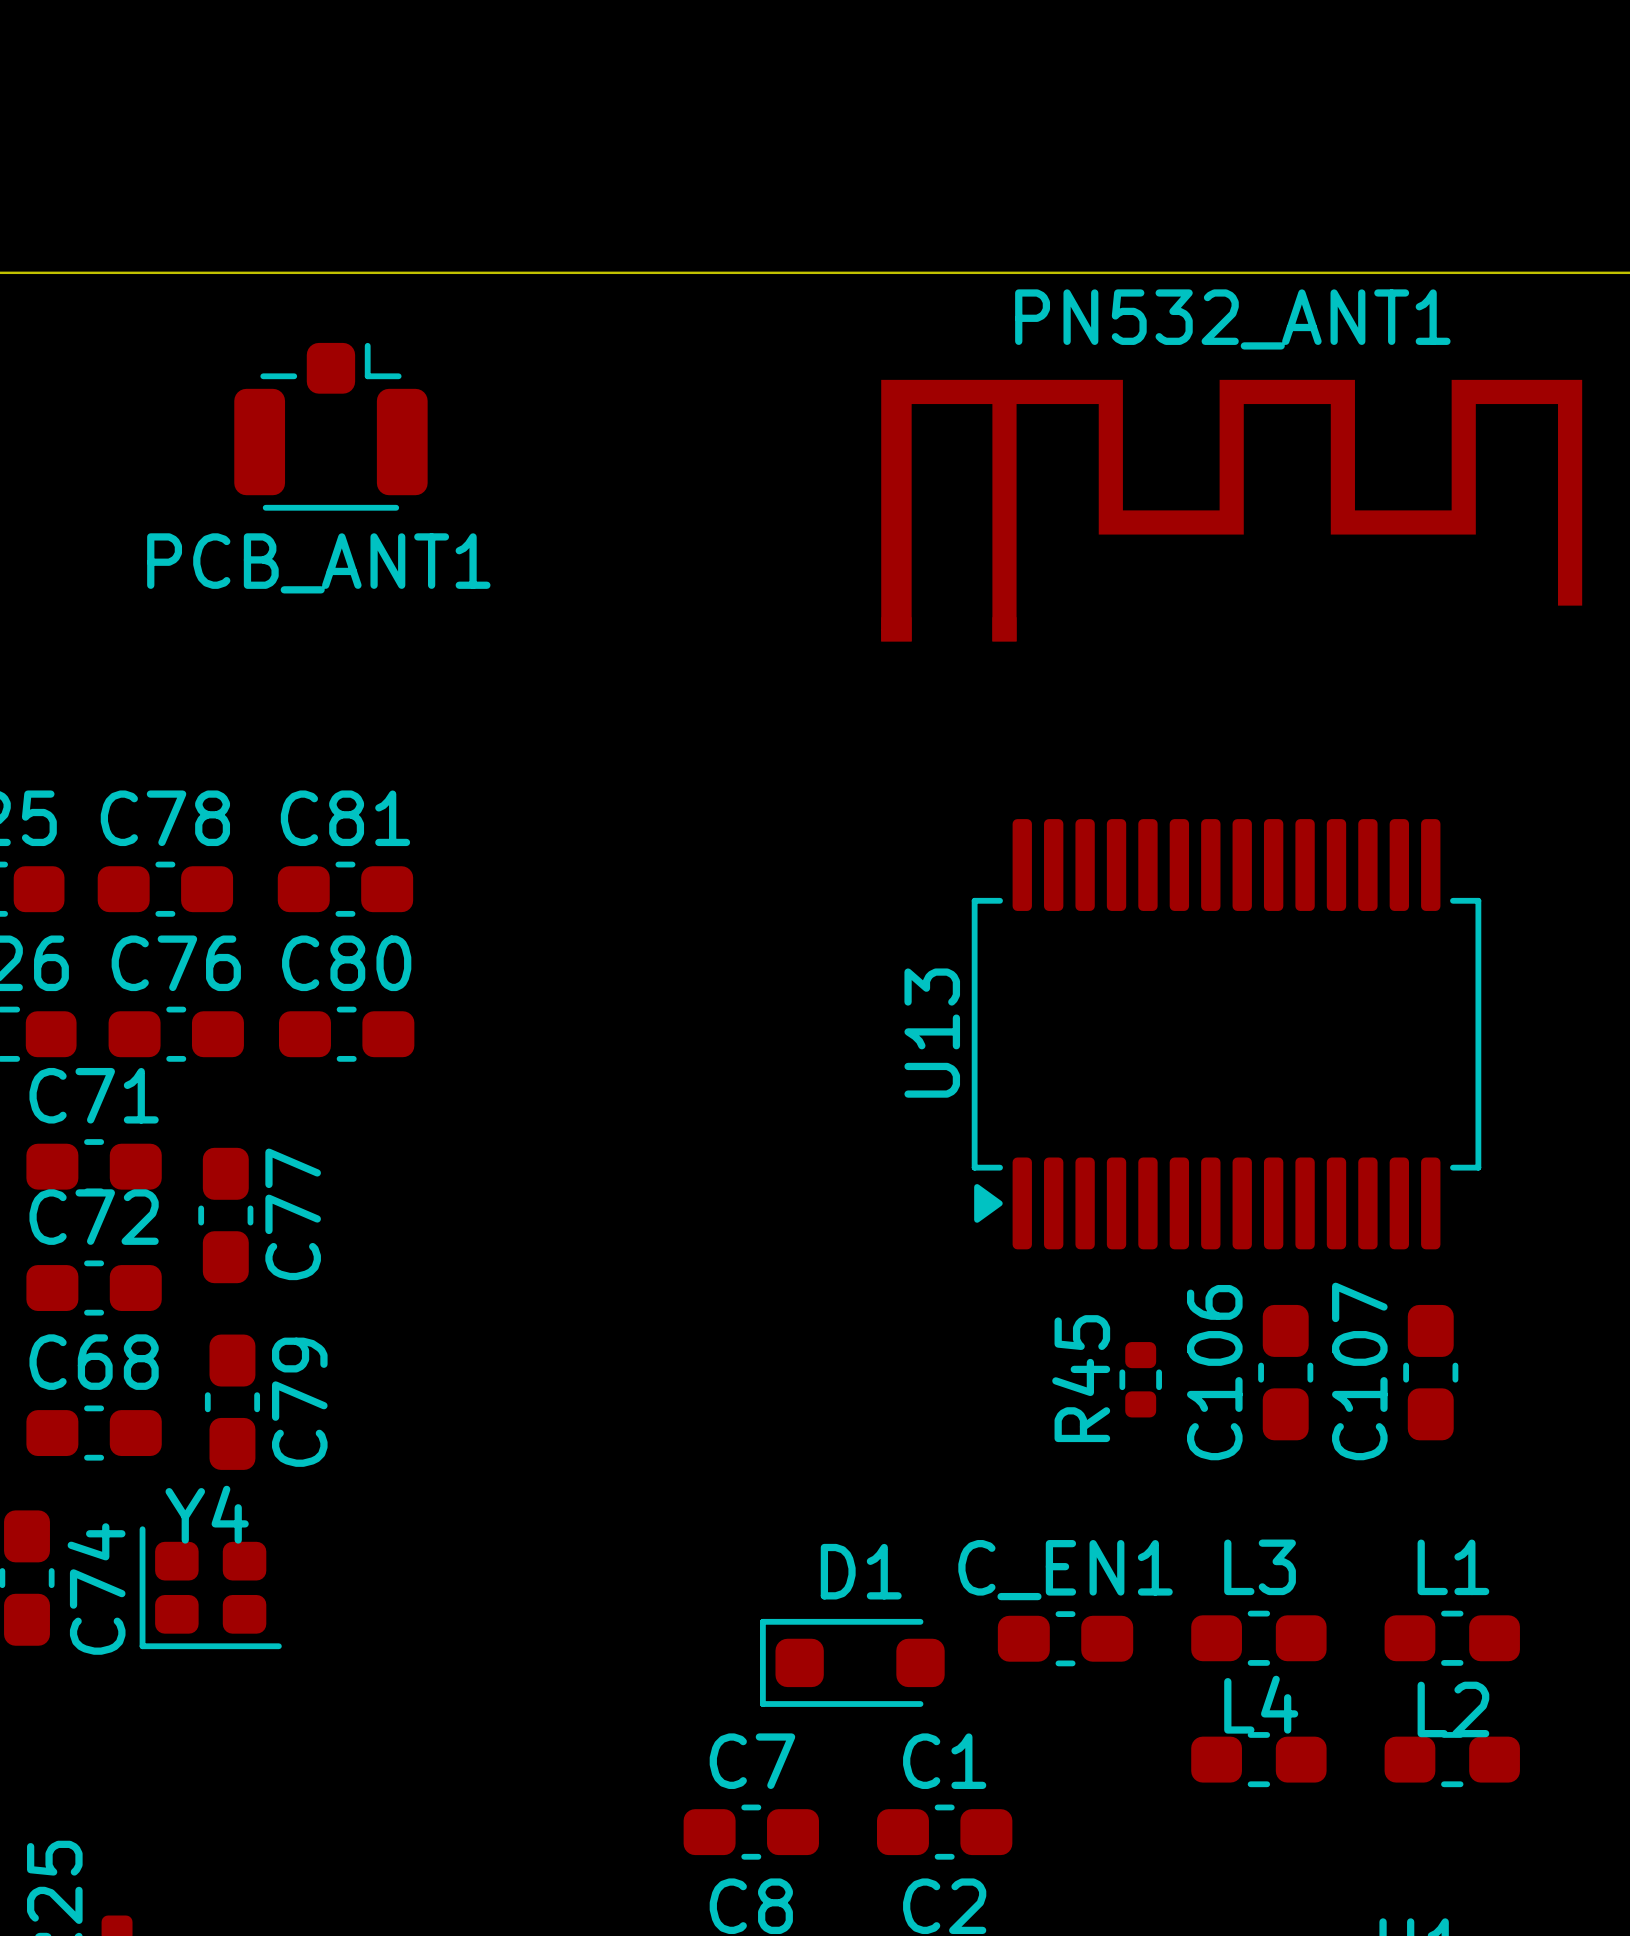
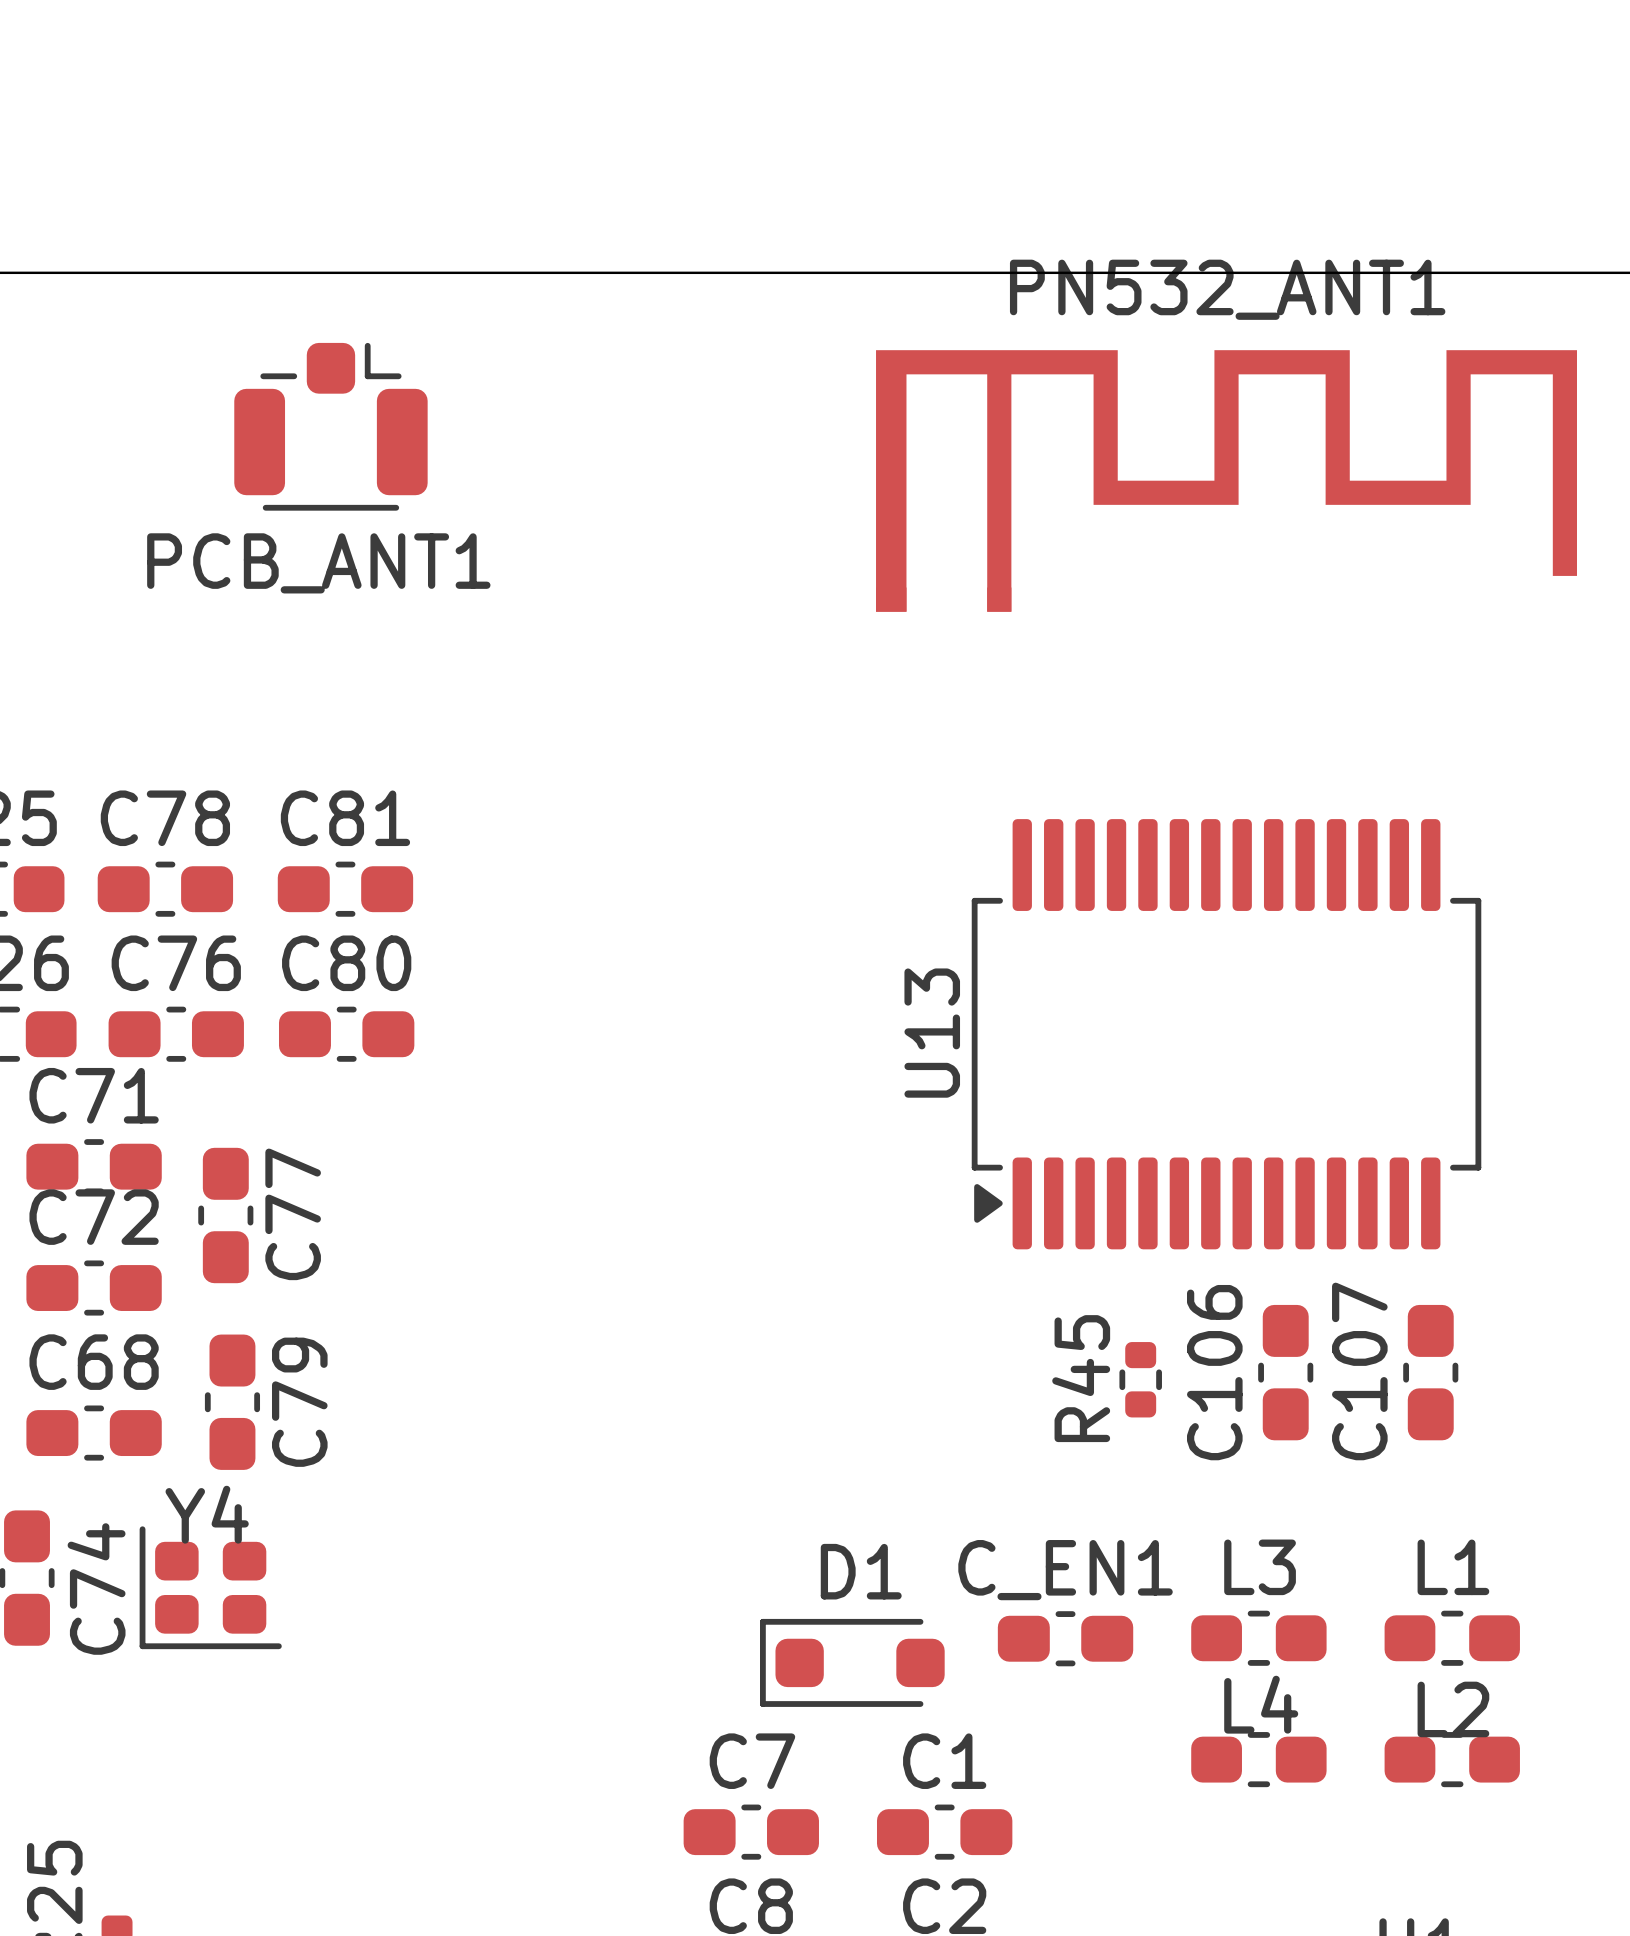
PN532_ANT1 position: (1231, 510) -> (1226, 480)

